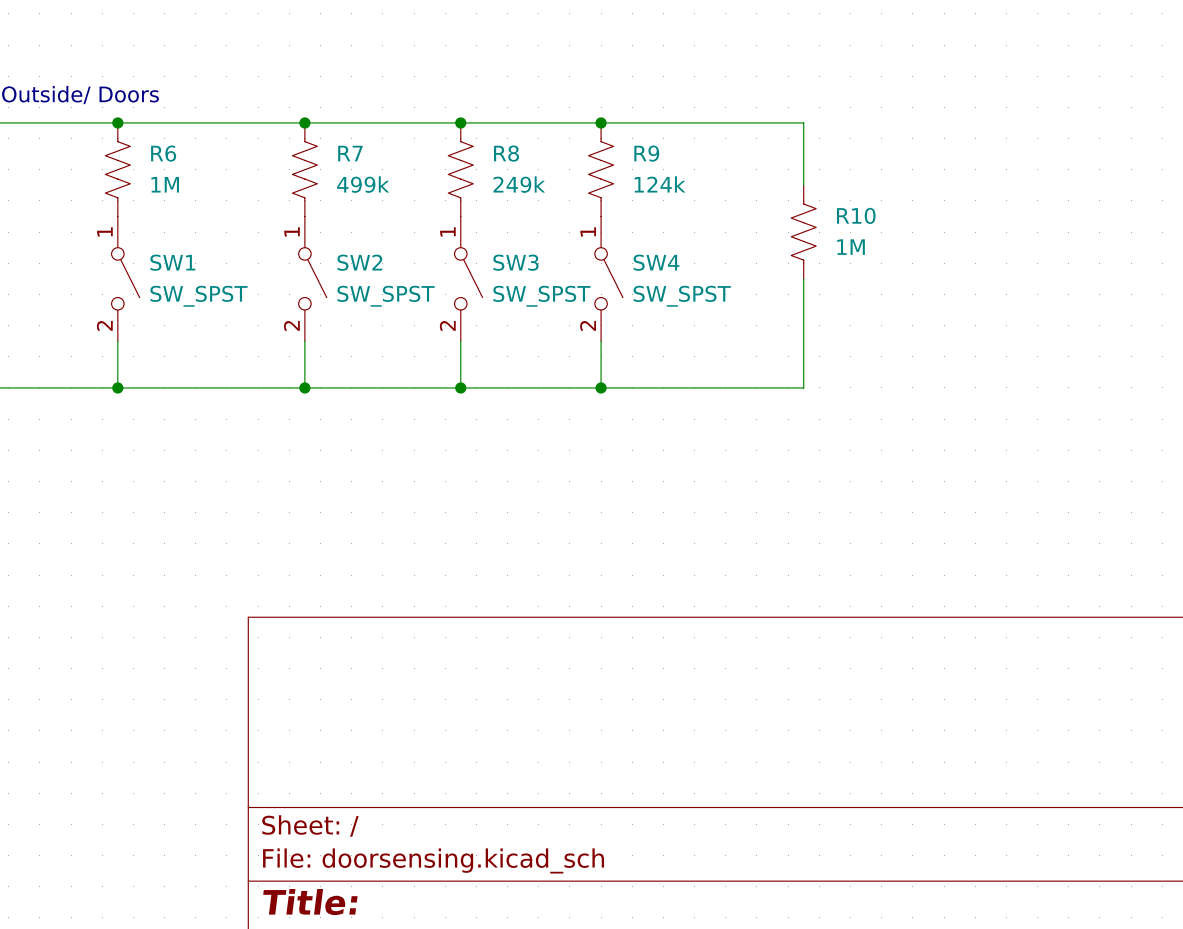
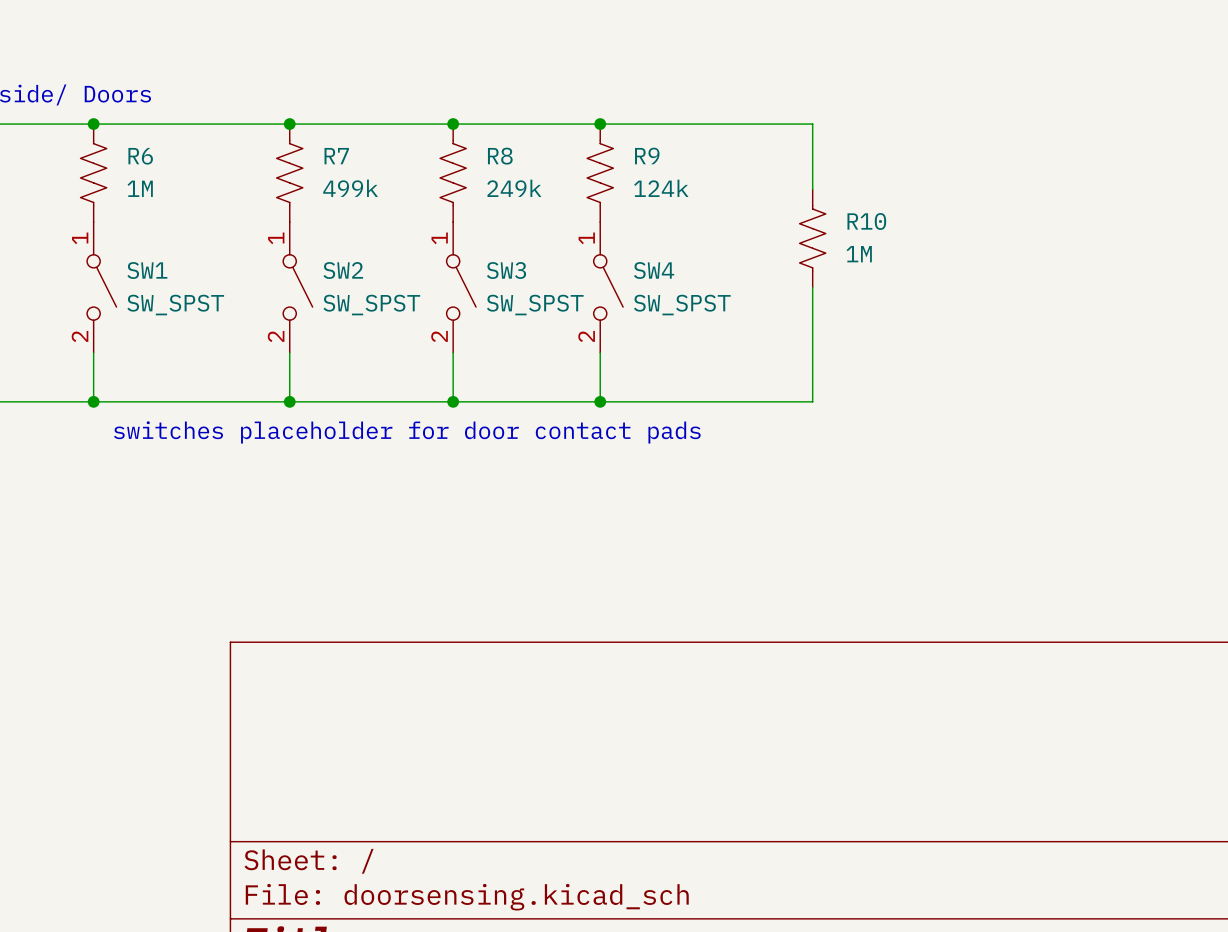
text: none -> switches placeholder for door contact pads (407, 432)

